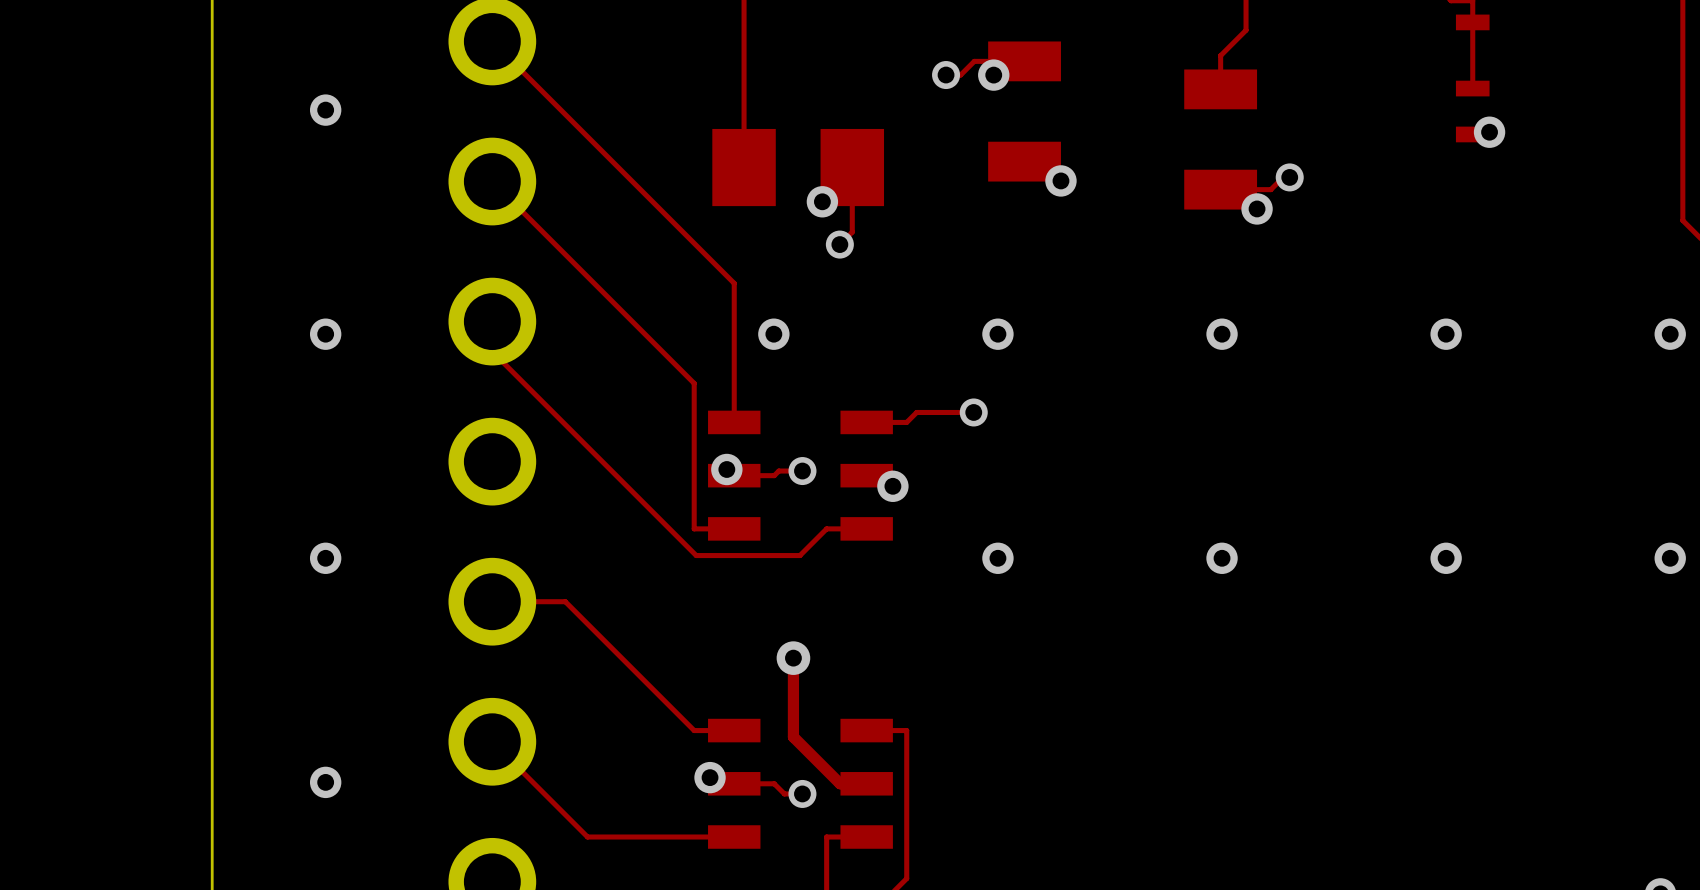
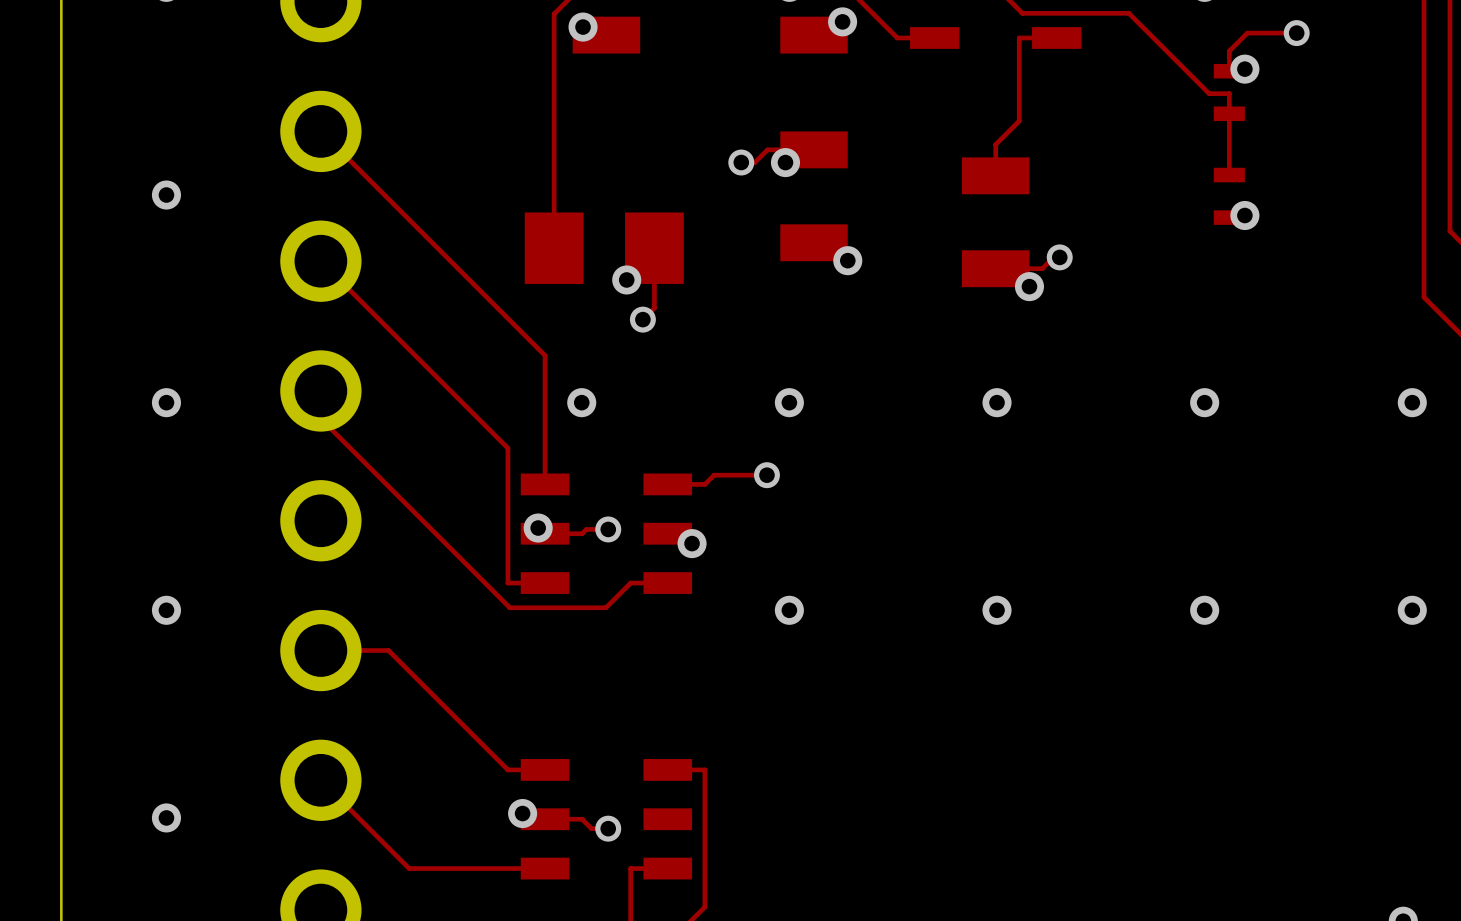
top track: (793, 658) (793, 737) (840, 783) (866, 783) -> none
via: (793, 658) -> none

